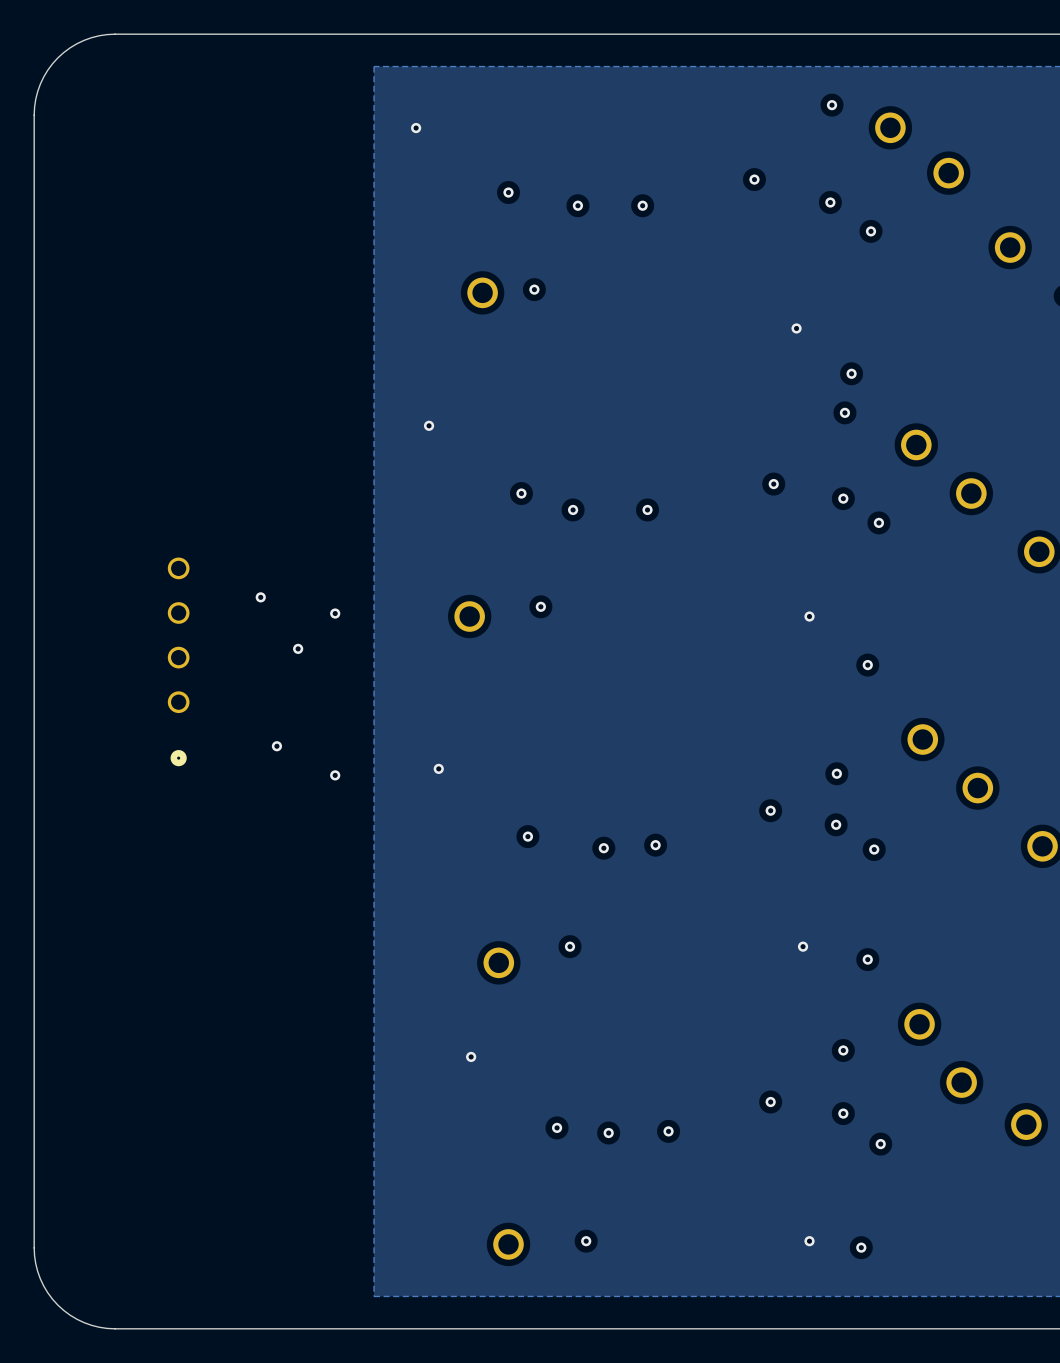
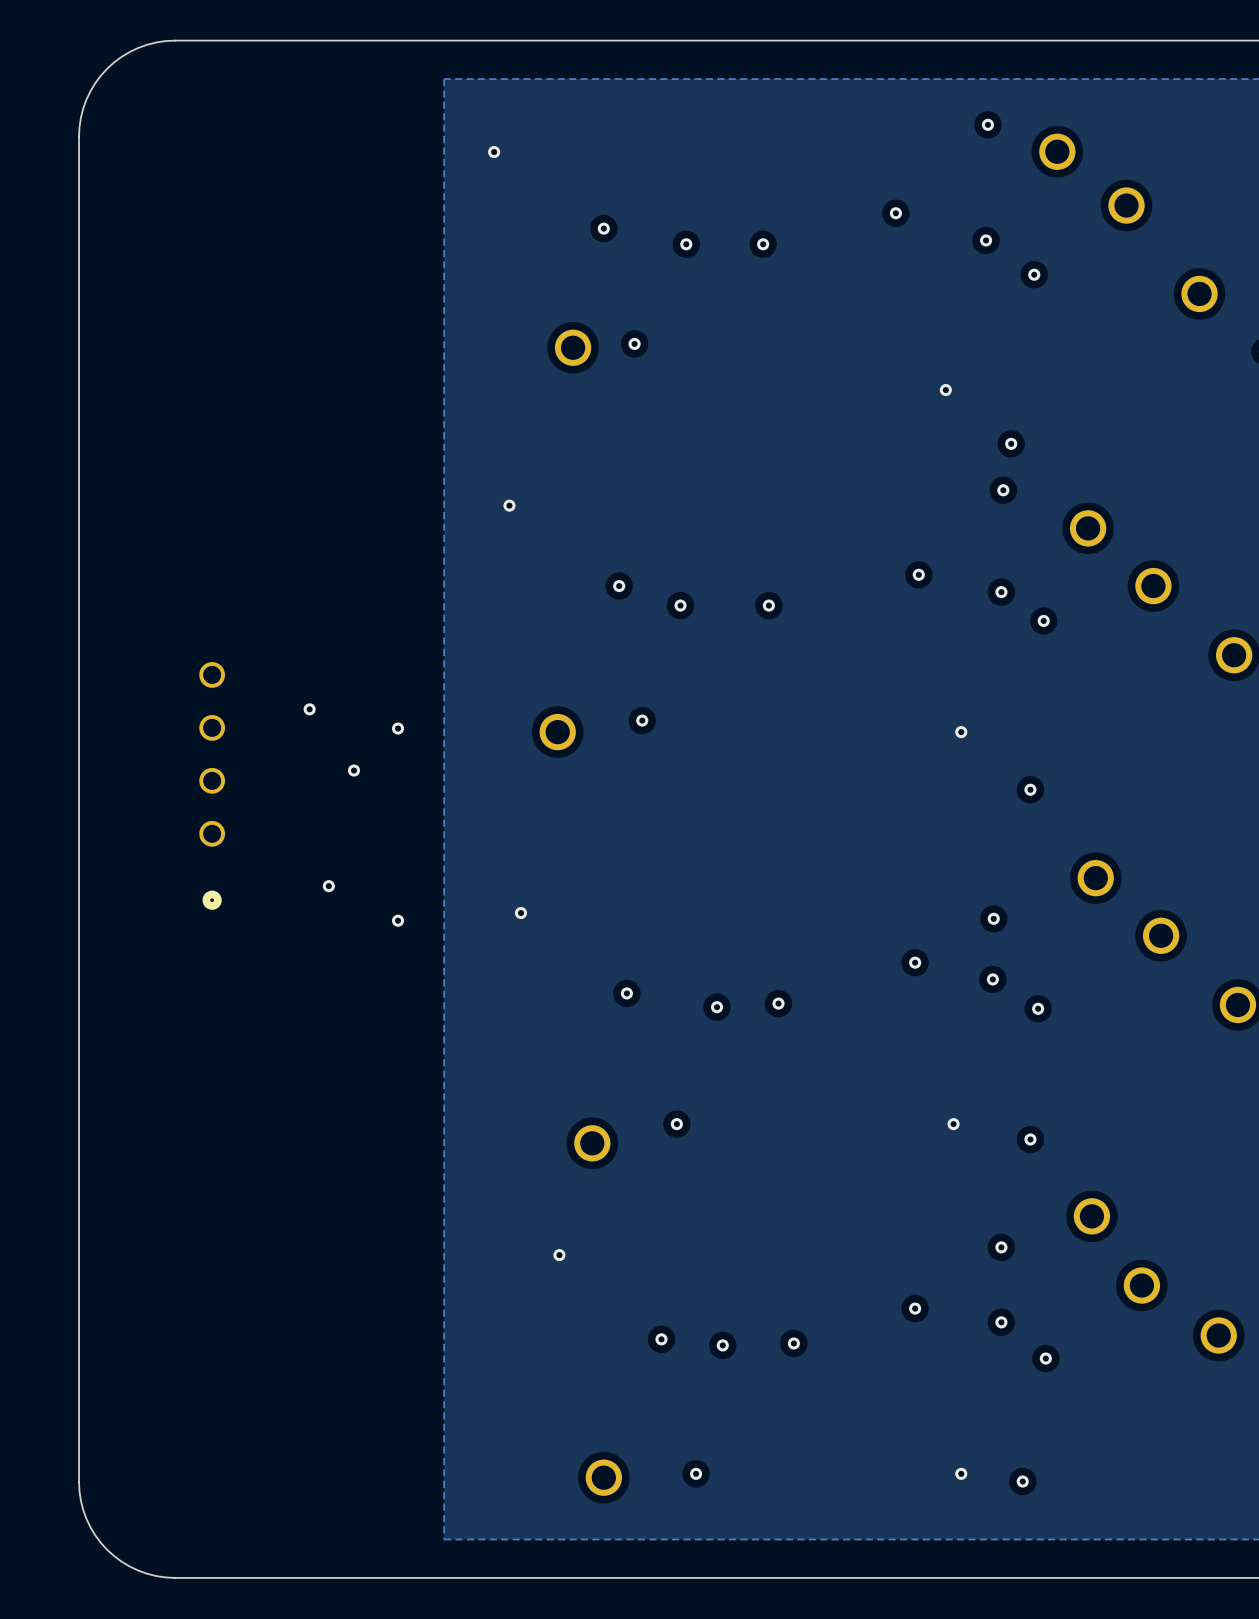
board edge: (147, 34) (99, 35) (84, 40) (70, 47) (52, 63) (43, 76) (35, 99) (34, 115) (34, 1255) (37, 1271) (43, 1286) (52, 1299) (70, 1315) (84, 1322) (99, 1327) (147, 1328) -> (175, 40) (156, 42) (138, 47) (121, 56) (107, 68) (95, 83) (86, 99) (80, 117) (79, 136) (79, 1491) (83, 1509) (90, 1527) (100, 1542) (114, 1556) (129, 1566) (147, 1573) (175, 1577)

